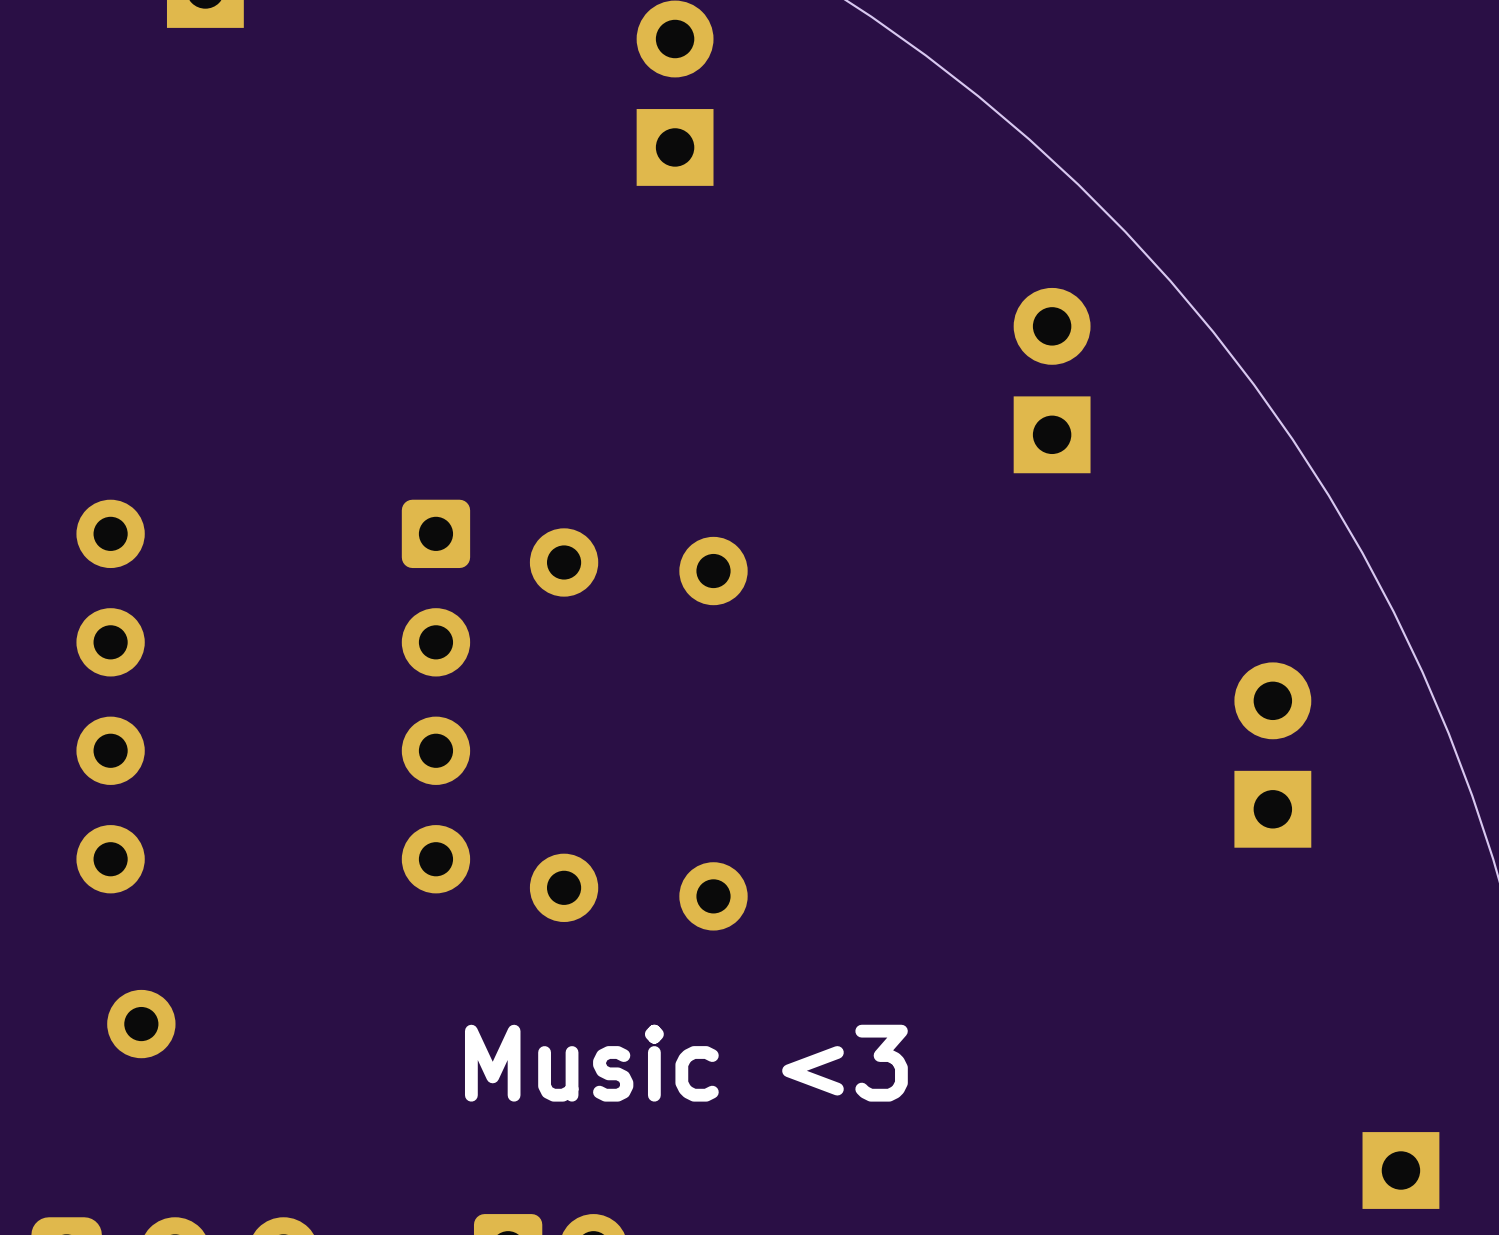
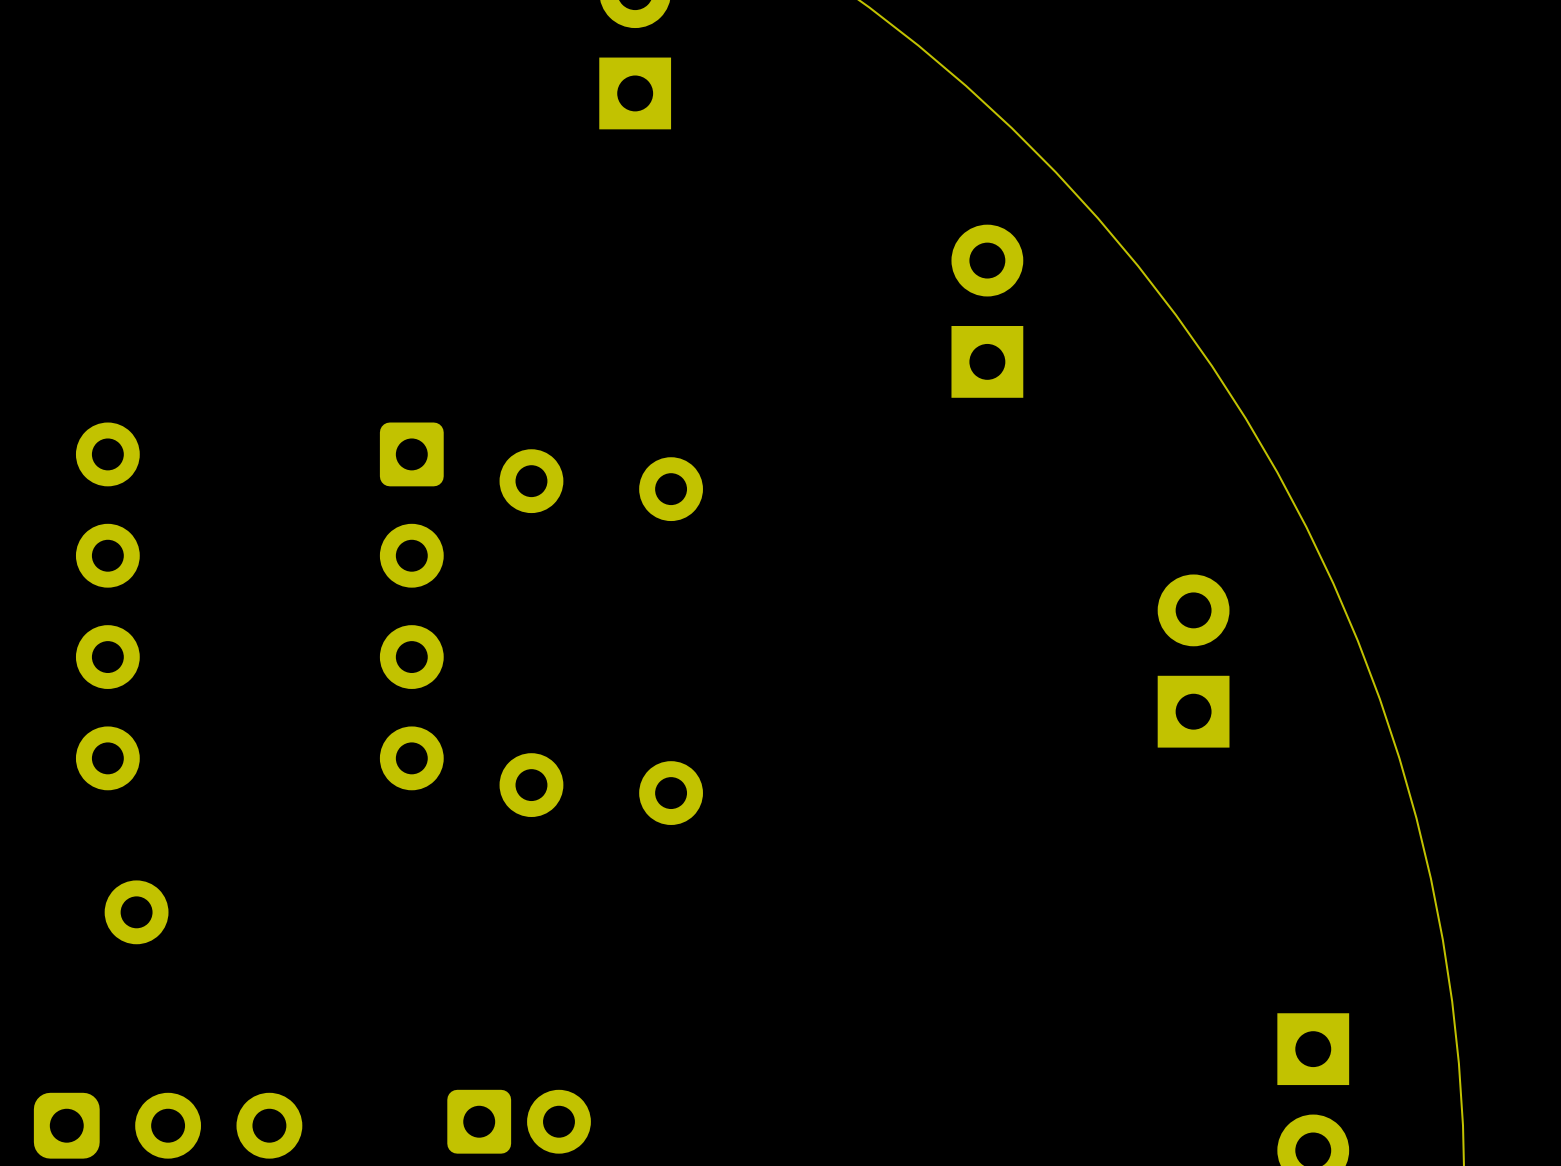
text: Music <3 (686, 1063) -> none

